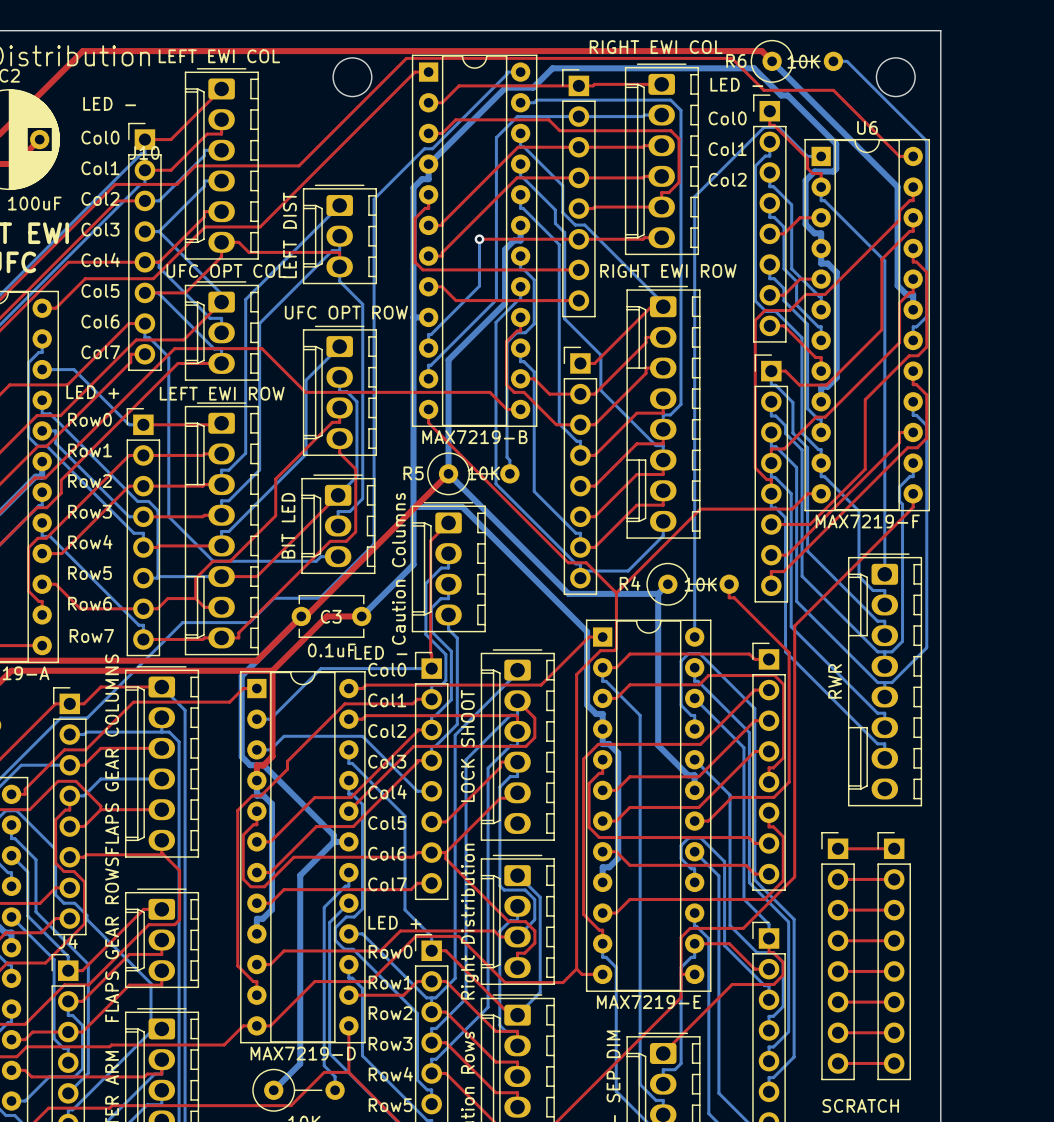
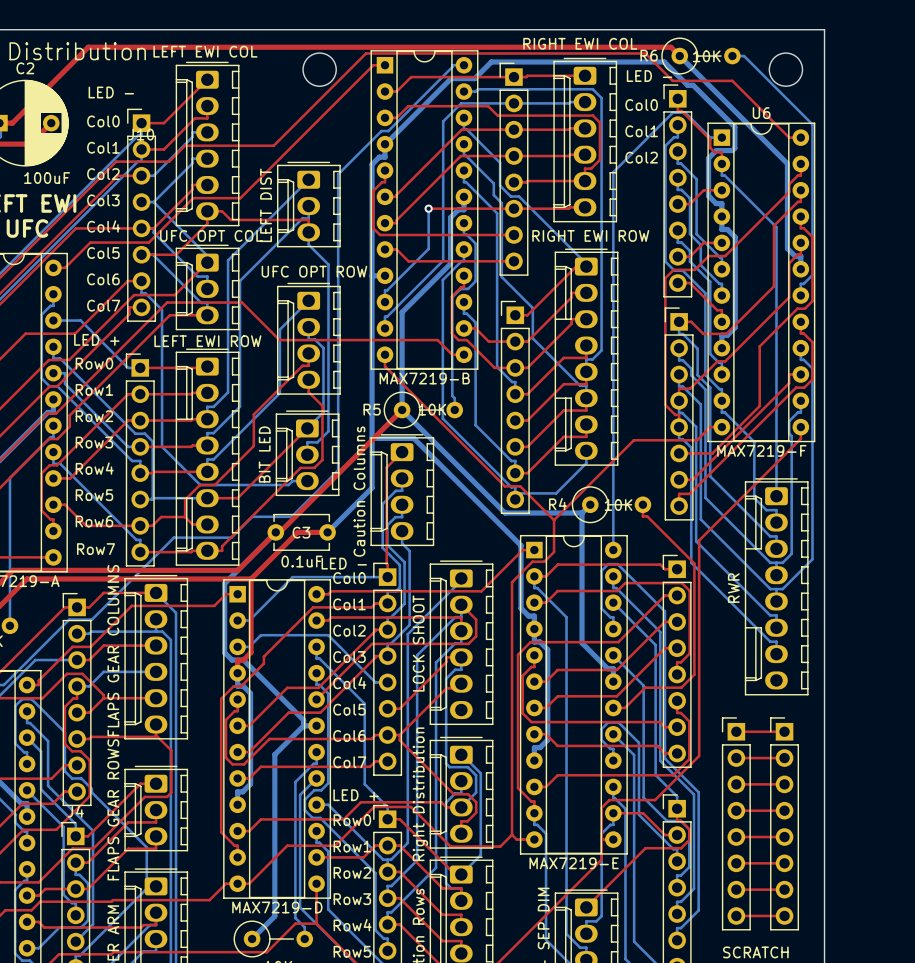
top track: (718, 509) (700, 509) (616, 593) (616, 648) -> (633, 440) (554, 520)
top track: none -> (546, 512) (554, 520)
top track: none -> (554, 520) (554, 552) (546, 559)

